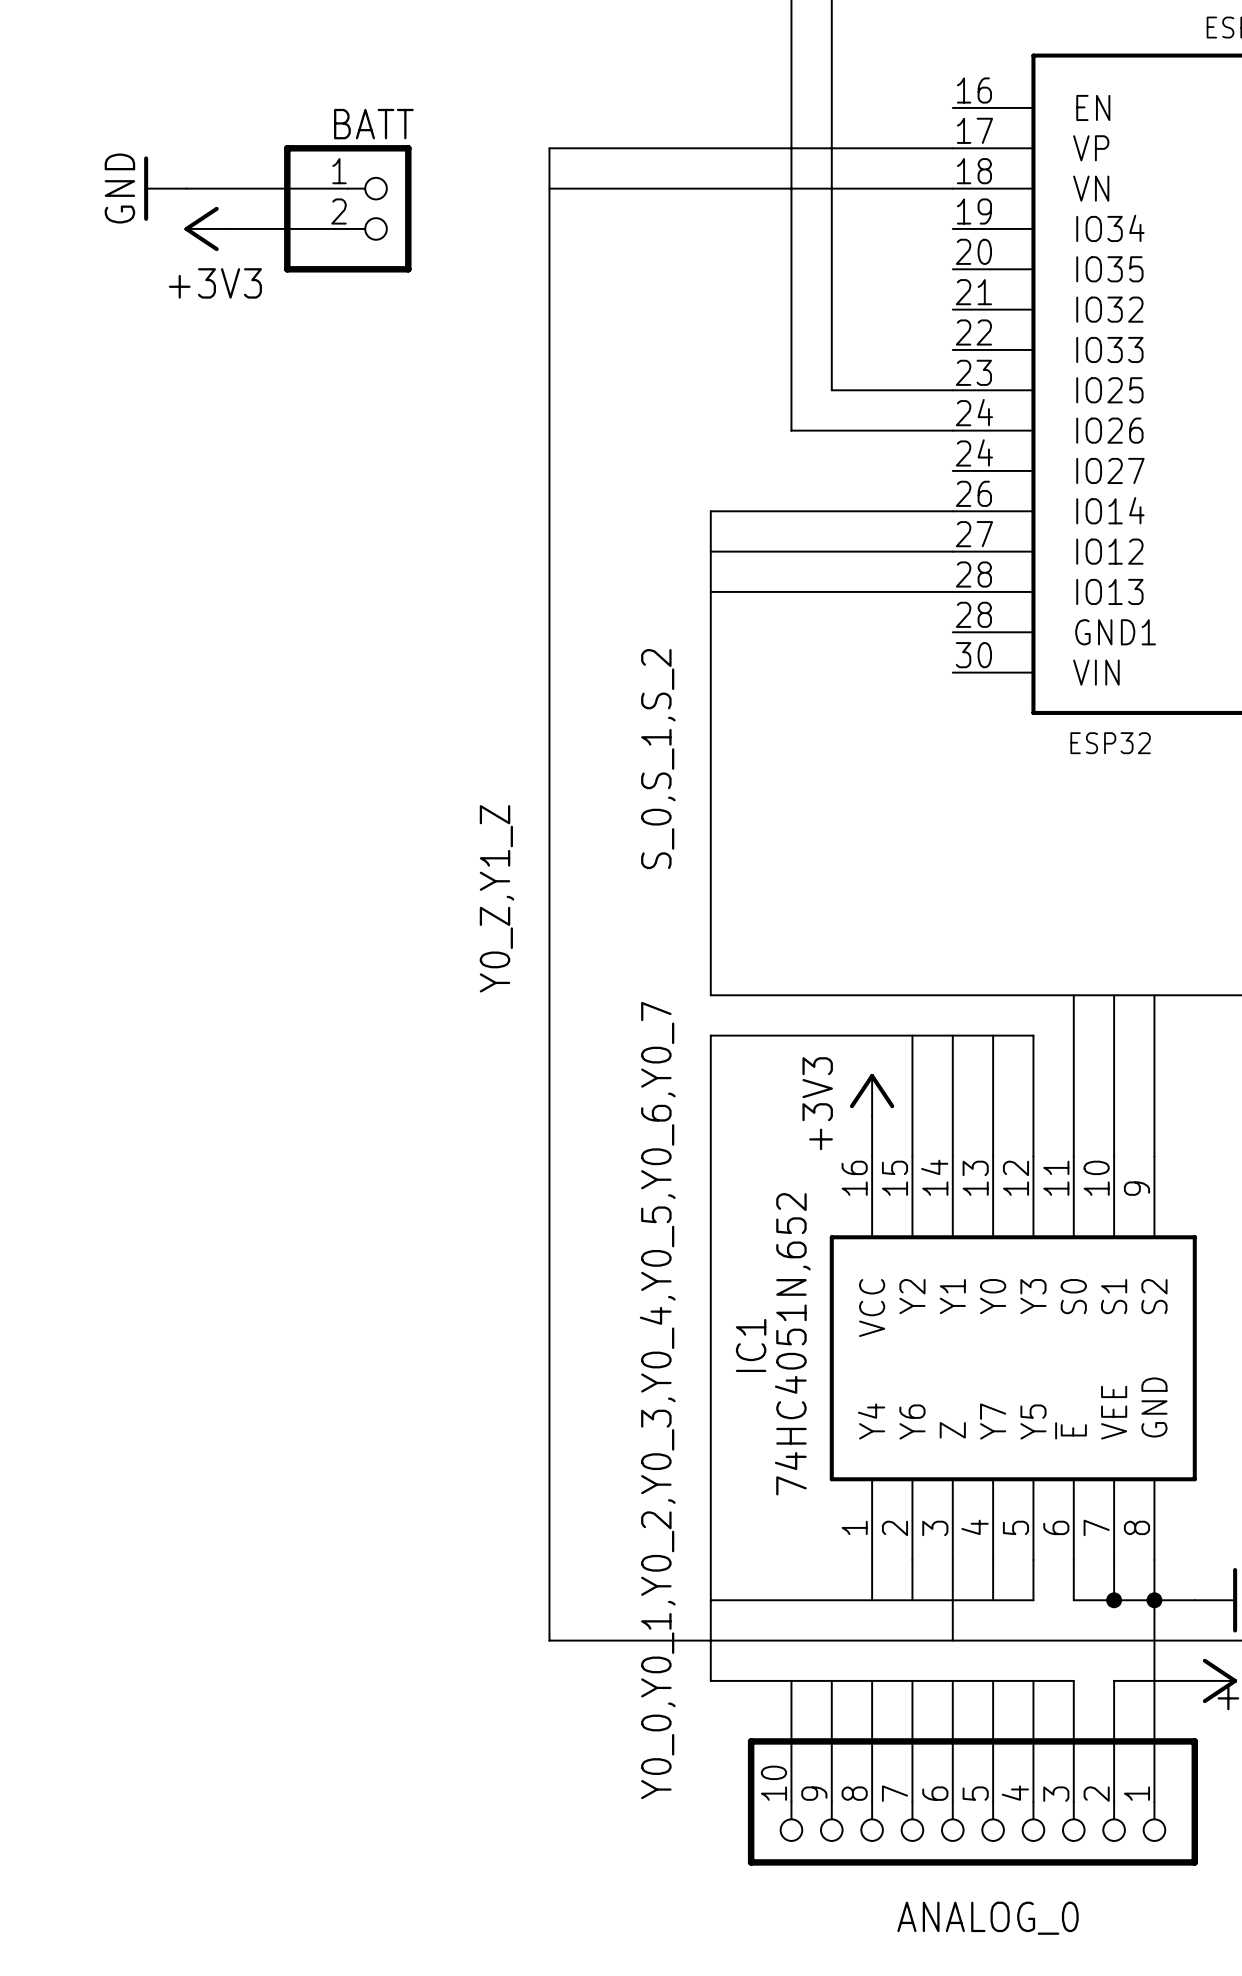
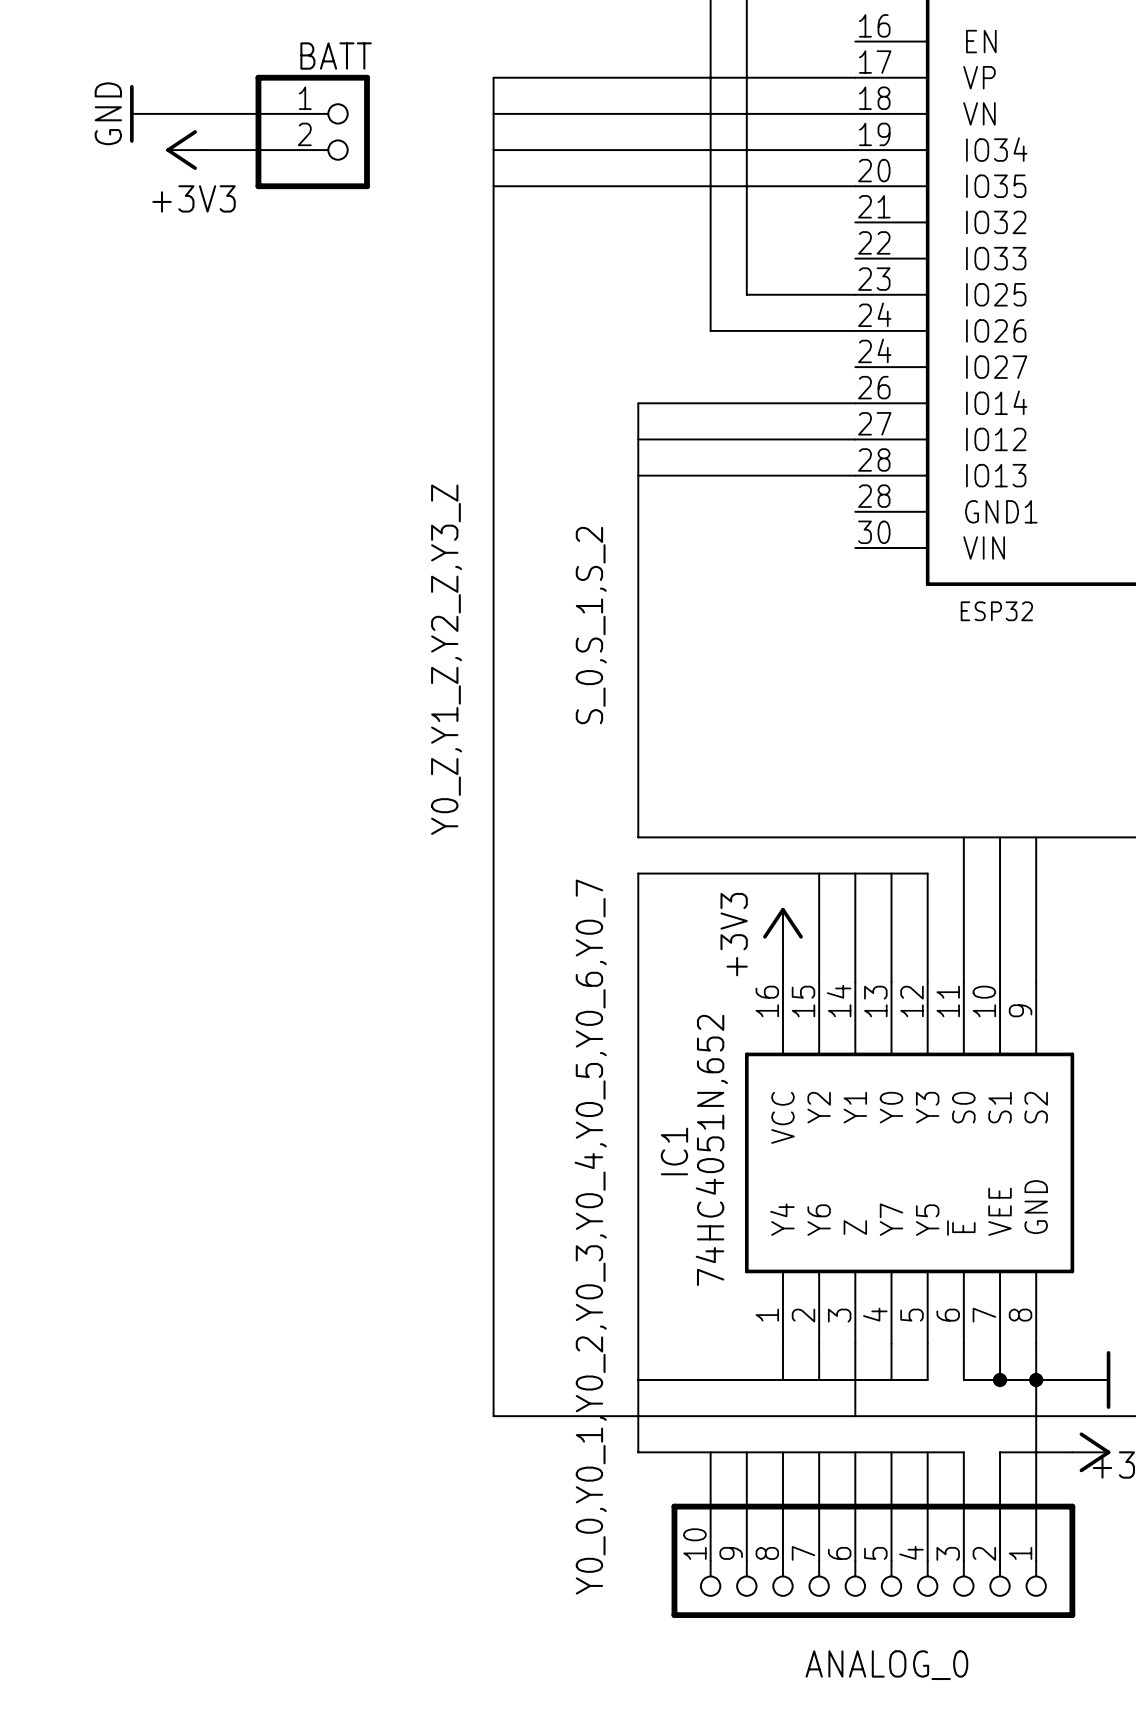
wire: none -> (493, 150) (855, 150)
wire: none -> (493, 186) (855, 186)
label: Y0_Z,Y1_Z (497, 898) -> Y0_Z,Y1_Z,Y2_Z,Y3_Z (446, 659)
label position: Y0_0,Y0_1,Y0_2,Y0_3,Y0_4,Y0_5,Y0_6,Y0_7 (657, 1400) -> Y0_0,Y0_1,Y0_2,Y0_3,Y0_4,Y0_5,Y0_6,Y0_7 (590, 1237)

